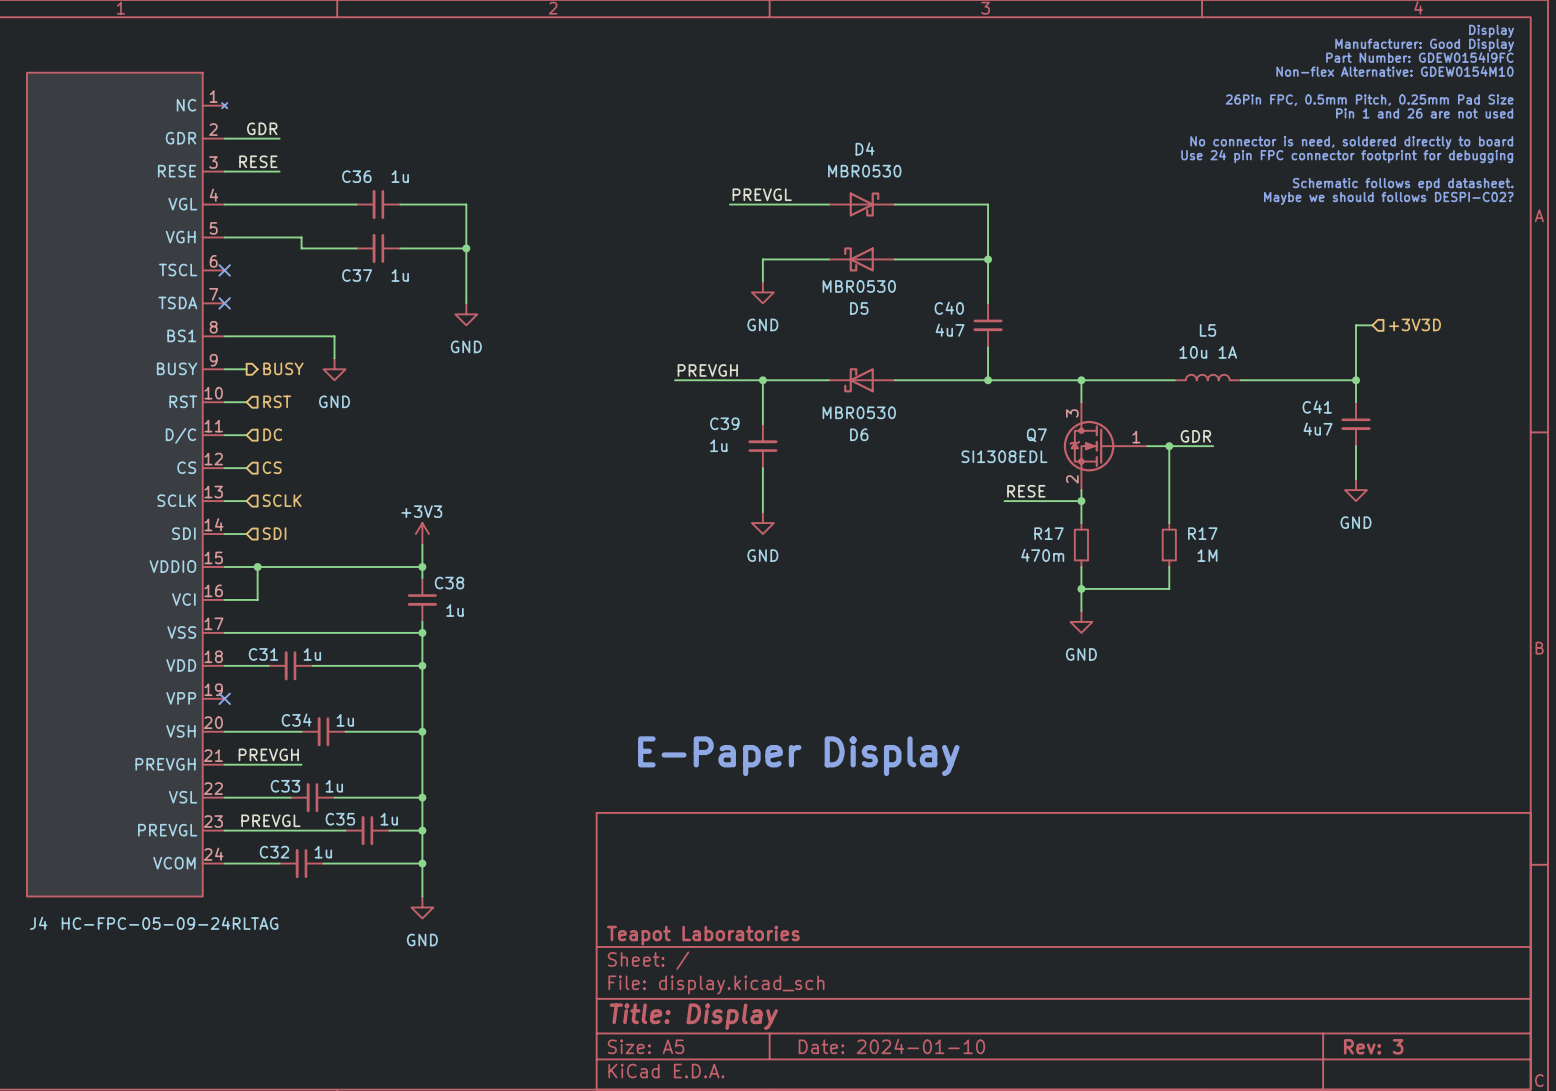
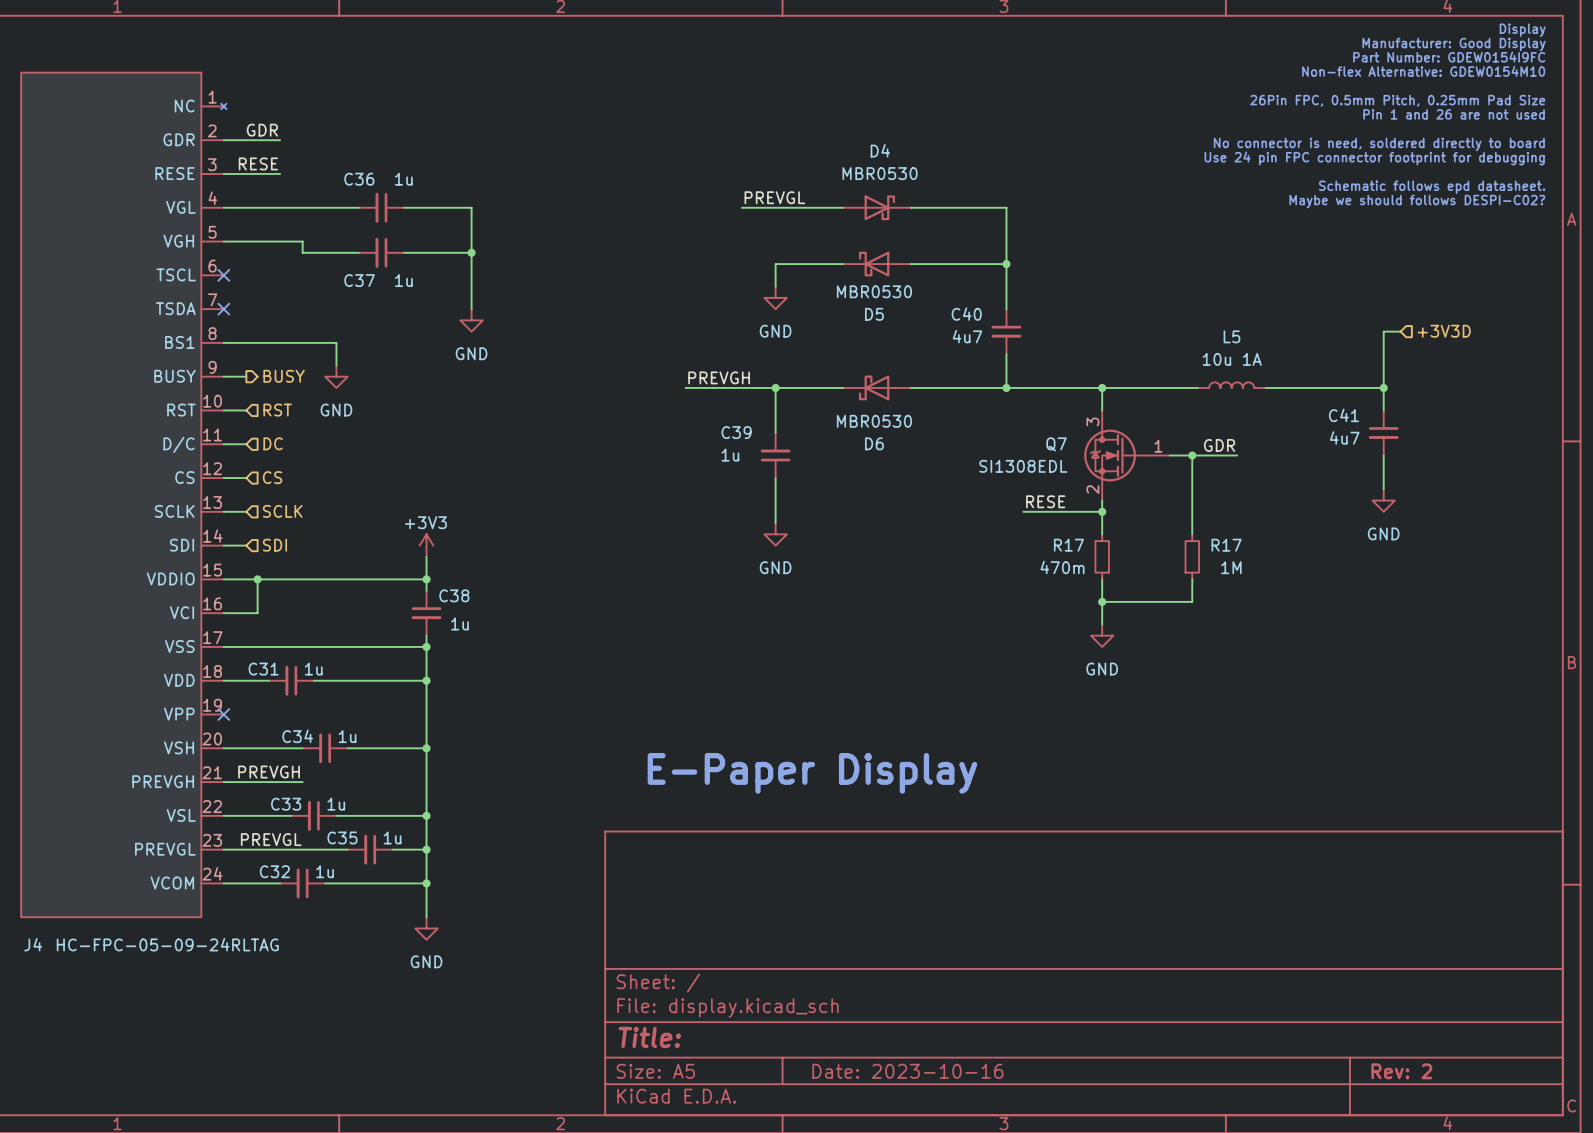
title block: Teapot Laboratories (703, 935) -> none
title block: Title: Display (693, 1016) -> Title: (649, 1037)
title block: Date: 2024-01-10 (891, 1046) -> Date: 2023-10-16 (907, 1071)
title block: Rev: 3 (1373, 1046) -> Rev: 2 (1401, 1071)

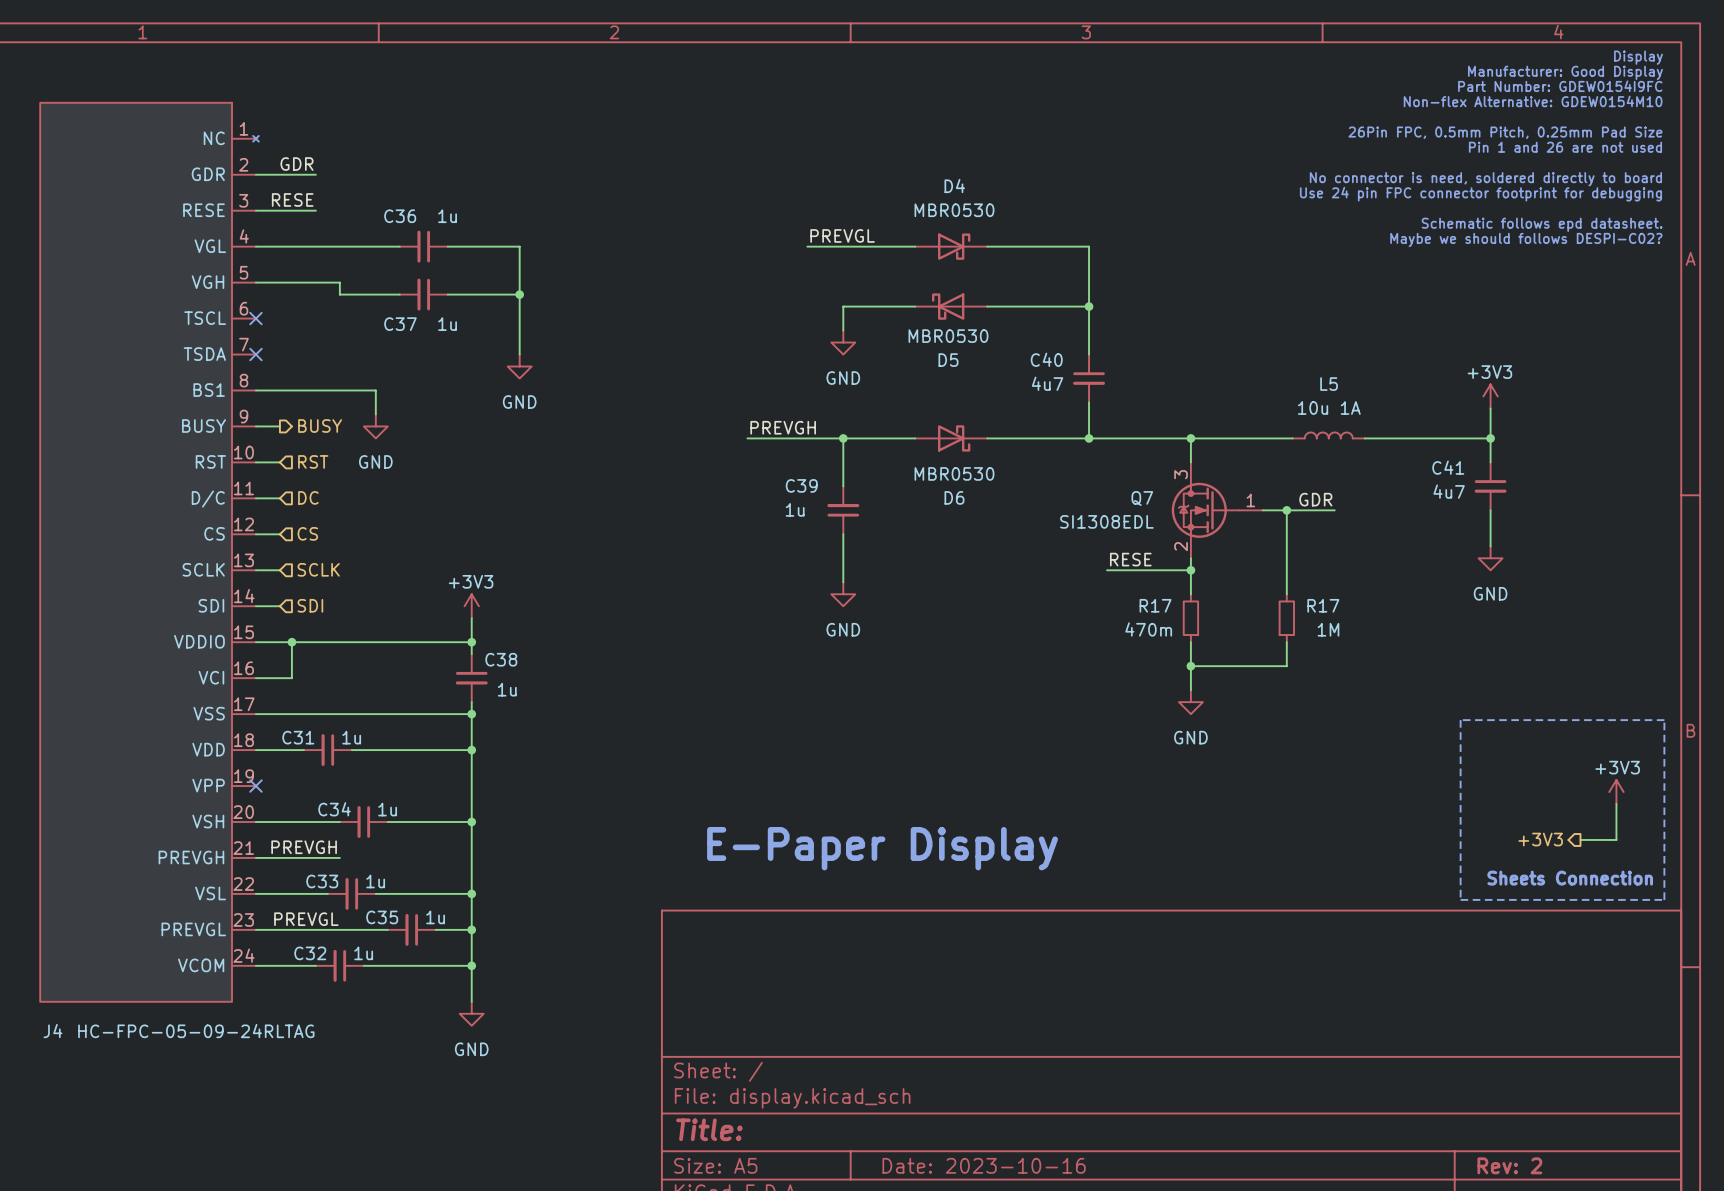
hierarchical label: +3V3D (1444, 331) -> none
power symbol: none -> +3V3 (1490, 396)
D6 flip: as is (874, 387) -> left-right (954, 438)
line: none -> (1460, 720) (1664, 720) (1664, 899) (1460, 899) (1460, 720)
power symbol: none -> +3V3 (1616, 792)
wire: none -> (1616, 804) (1616, 839) (1580, 839)
hierarchical label: none -> +3V3 (1540, 839)
text: none -> Sheets Connection (1570, 878)

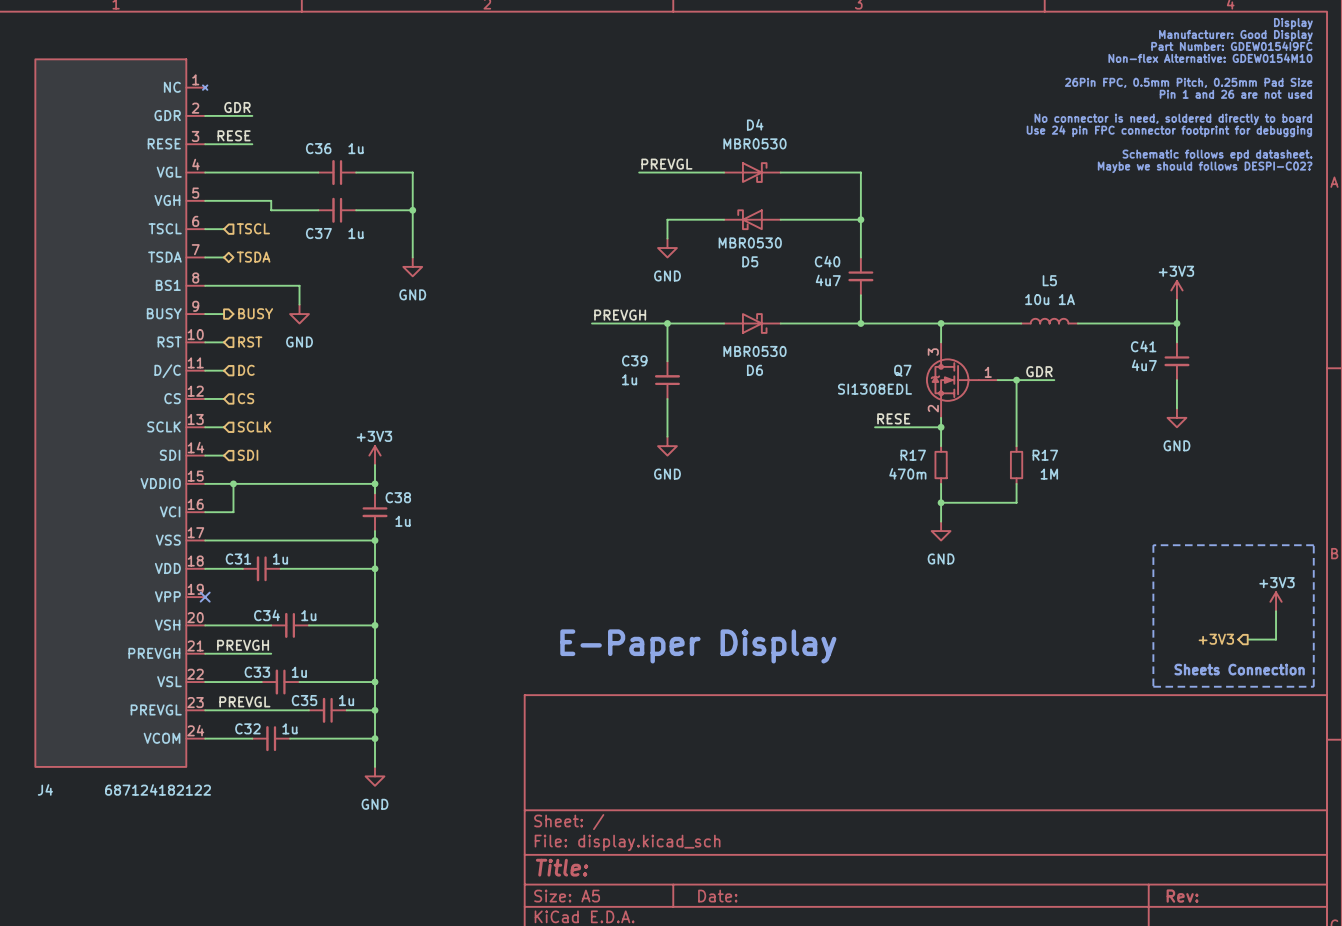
wire: none -> (205, 229) (224, 229)
no-connect mark: (255, 318) -> none
hierarchical label: none -> TSCL (253, 228)
wire: none -> (205, 257) (224, 257)
no-connect mark: (255, 354) -> none
hierarchical label: none -> TSDA (253, 257)
J4 value: HC-FPC-05-09-24RLTAG (196, 1031) -> 687124182122 (158, 789)
title block: Date: 2023-10-16 (984, 1165) -> Date: (717, 896)
title block: Rev: 2 (1509, 1165) -> Rev: (1182, 896)

